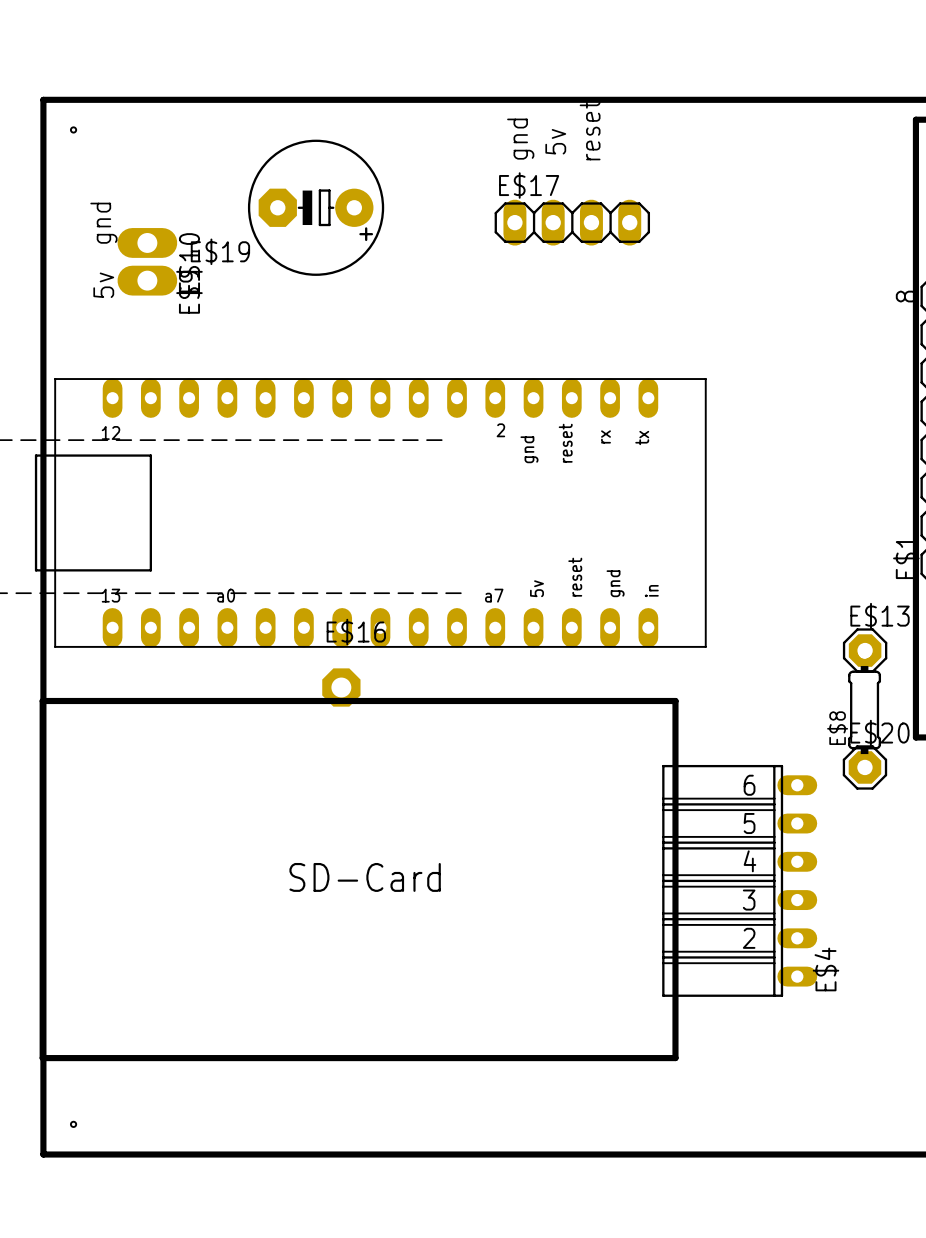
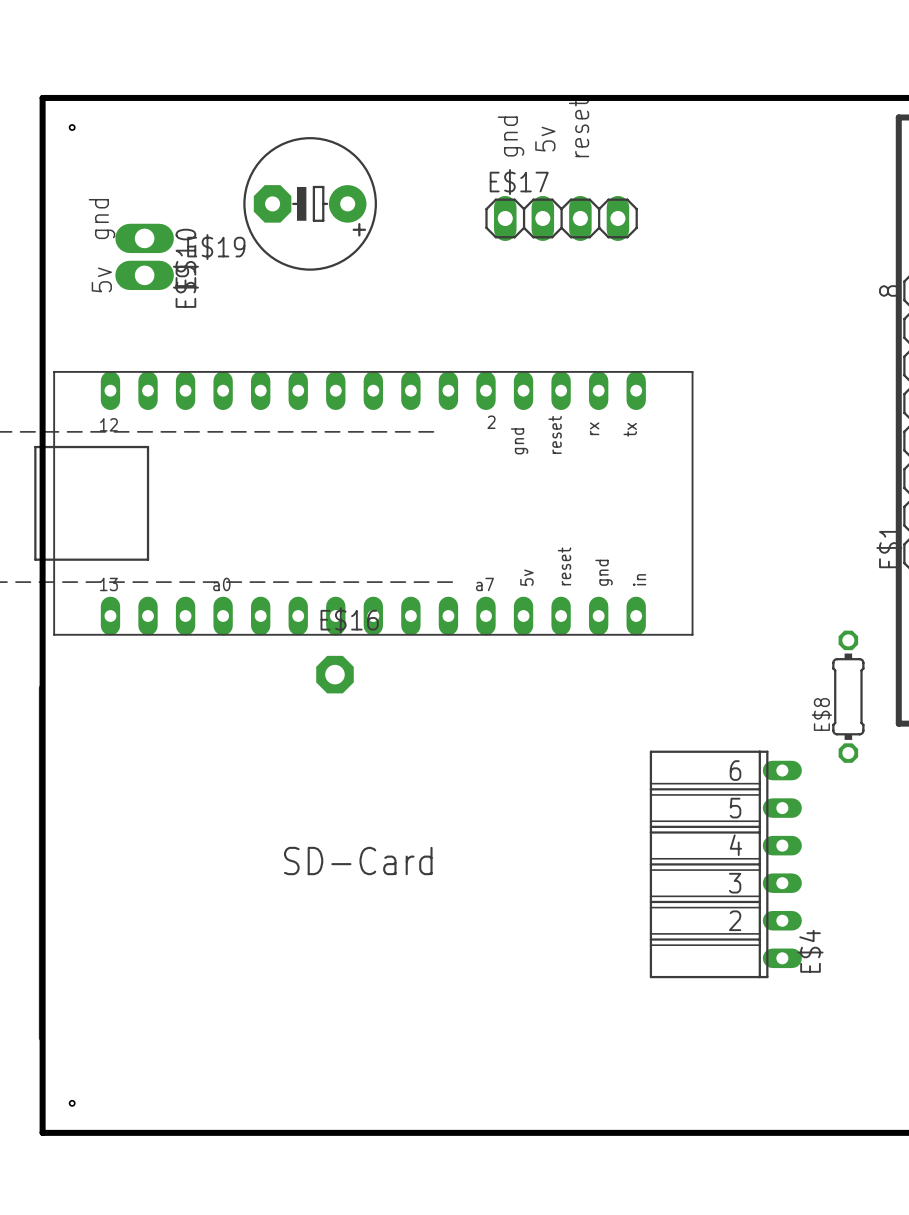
E$13: (865, 650) -> none
line: (42, 700) (675, 700) (675, 1058) (42, 1058) -> none
E$20: (864, 767) -> none

